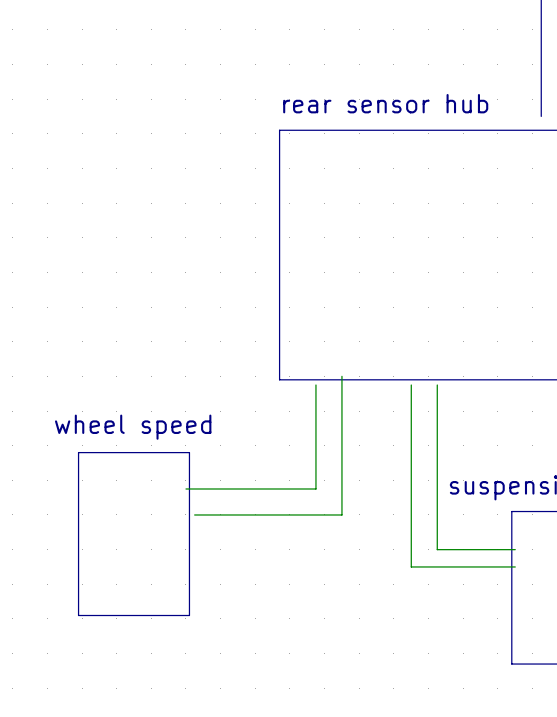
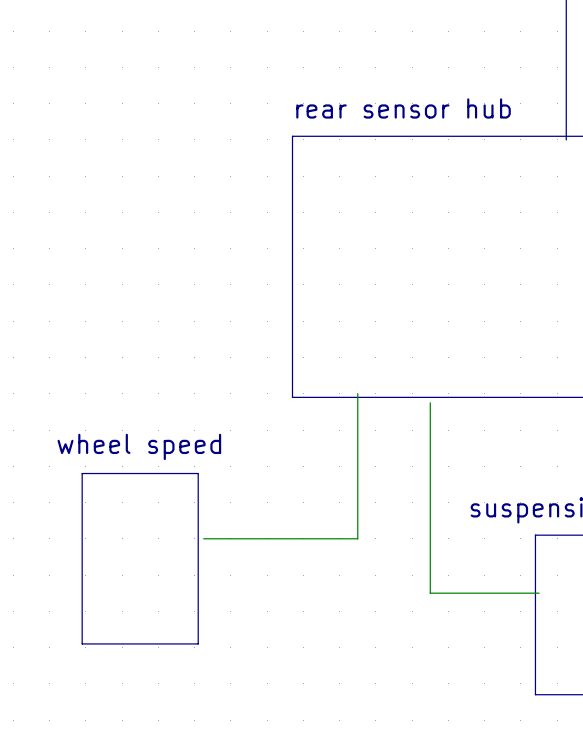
bus: none -> (566, 121) (566, 139)
wire: (315, 385) (315, 488) (185, 488) -> none
wire: (437, 385) (437, 549) (515, 549) -> none

